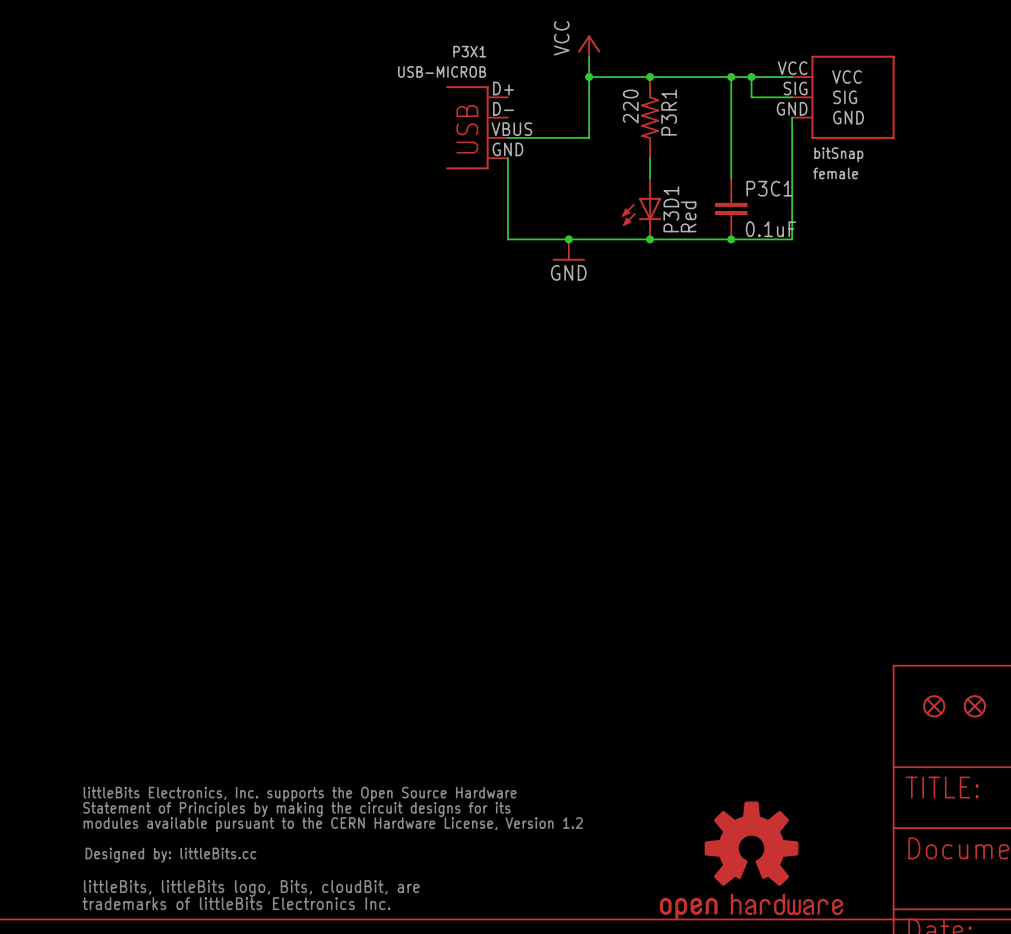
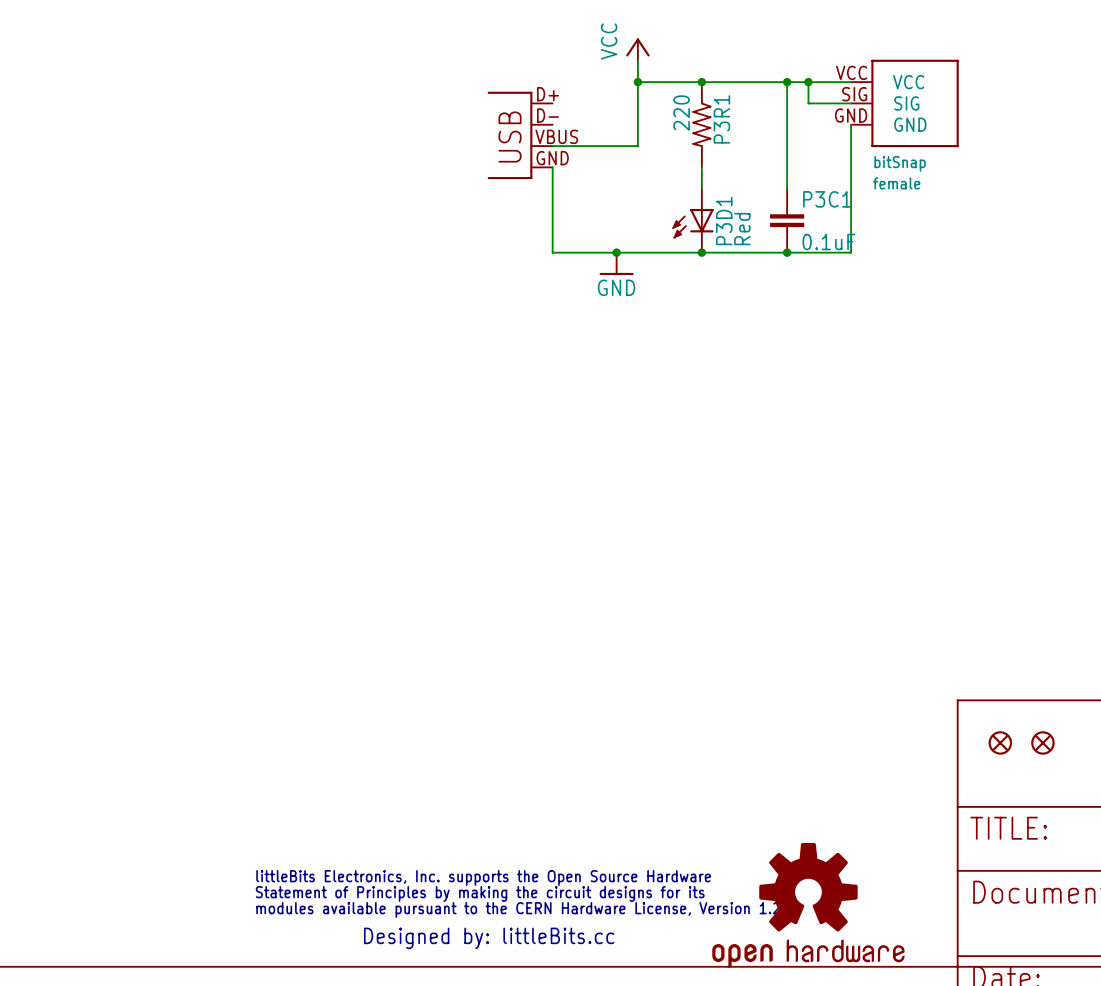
P3X1 name: P3X1 (469, 51) -> none
P3X1 value: USB-MICROB (442, 71) -> none
part: (332, 848) -> none
part: none -> (518, 909)

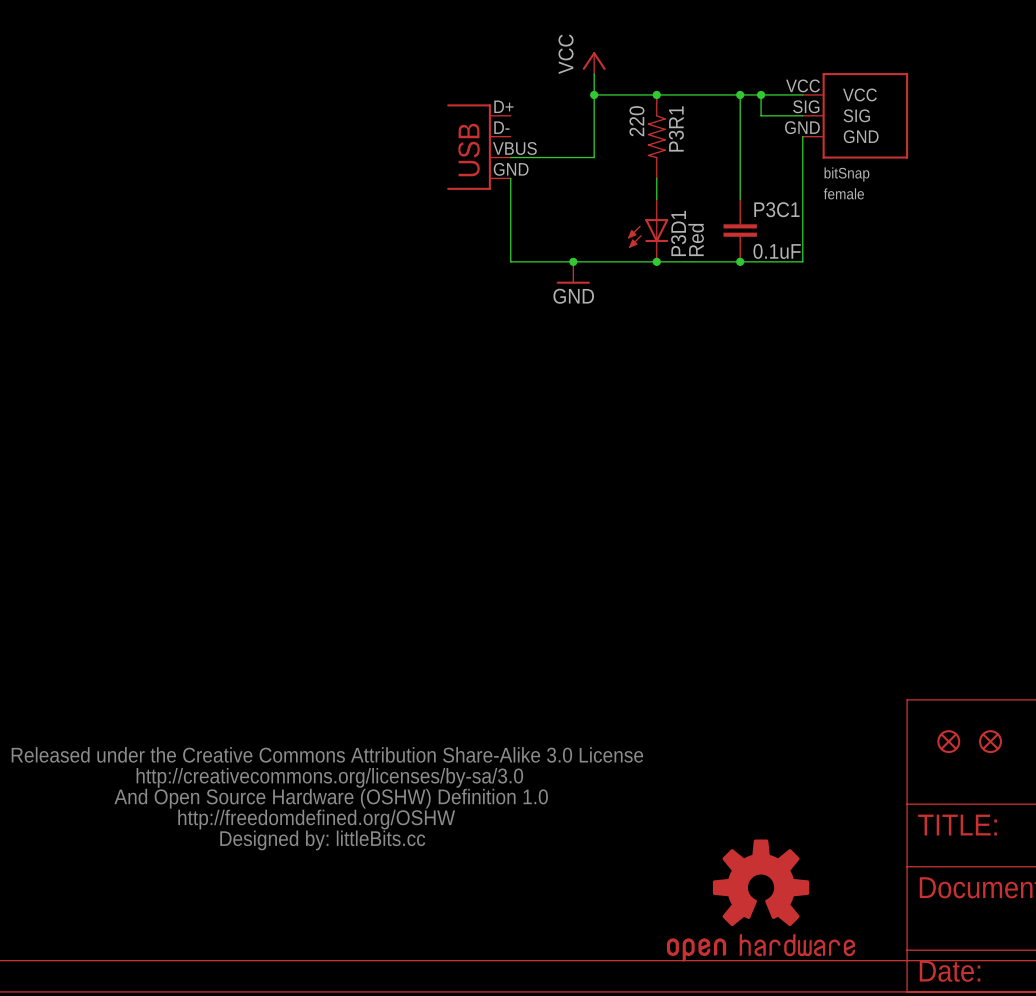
part: none -> (327, 798)
part: (518, 909) -> none

